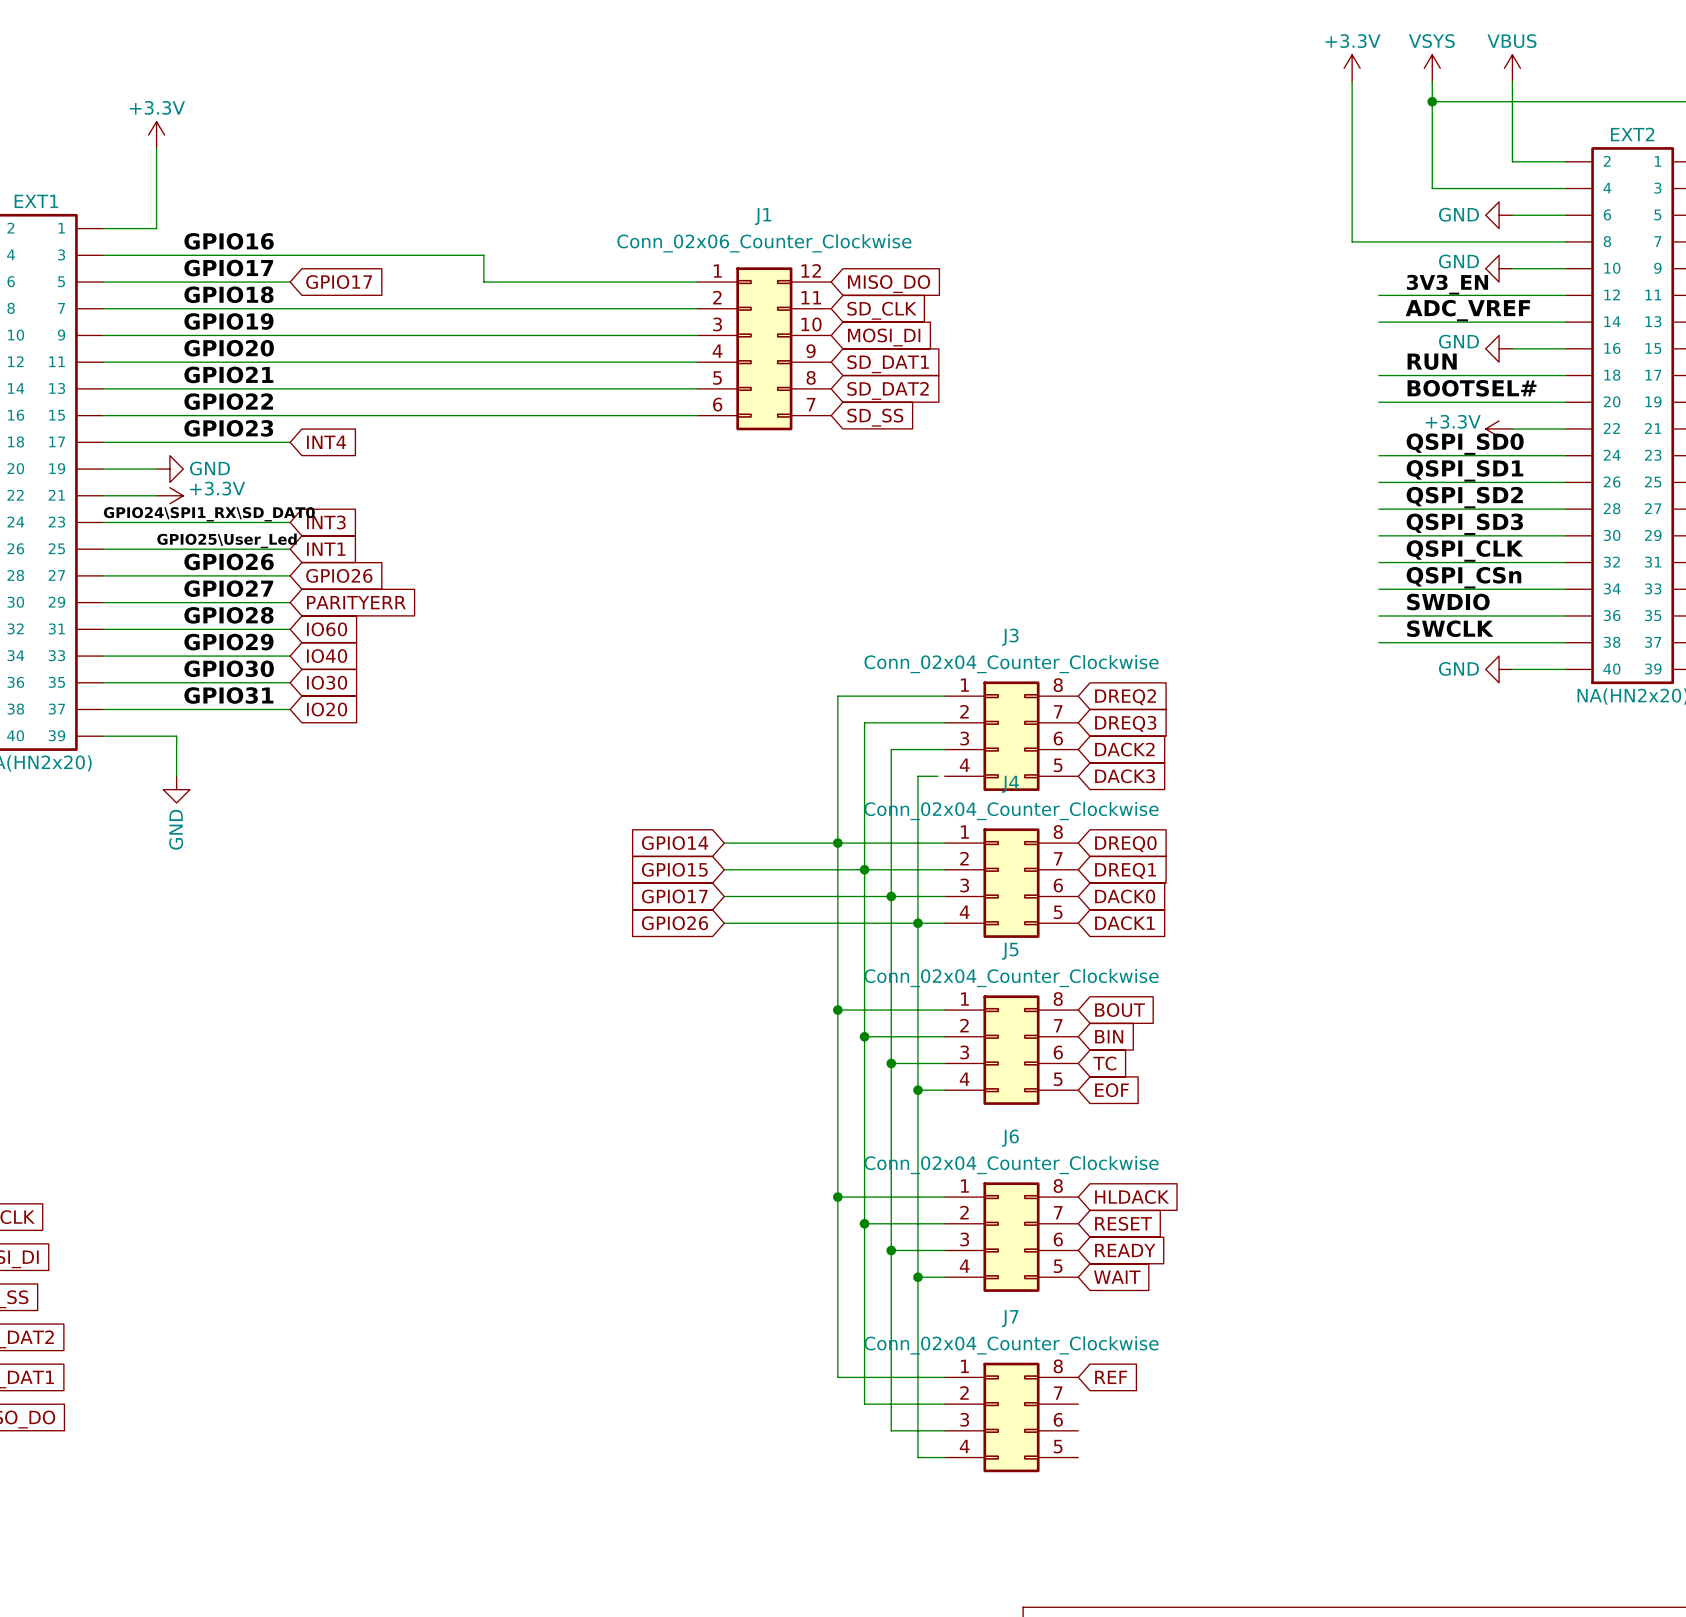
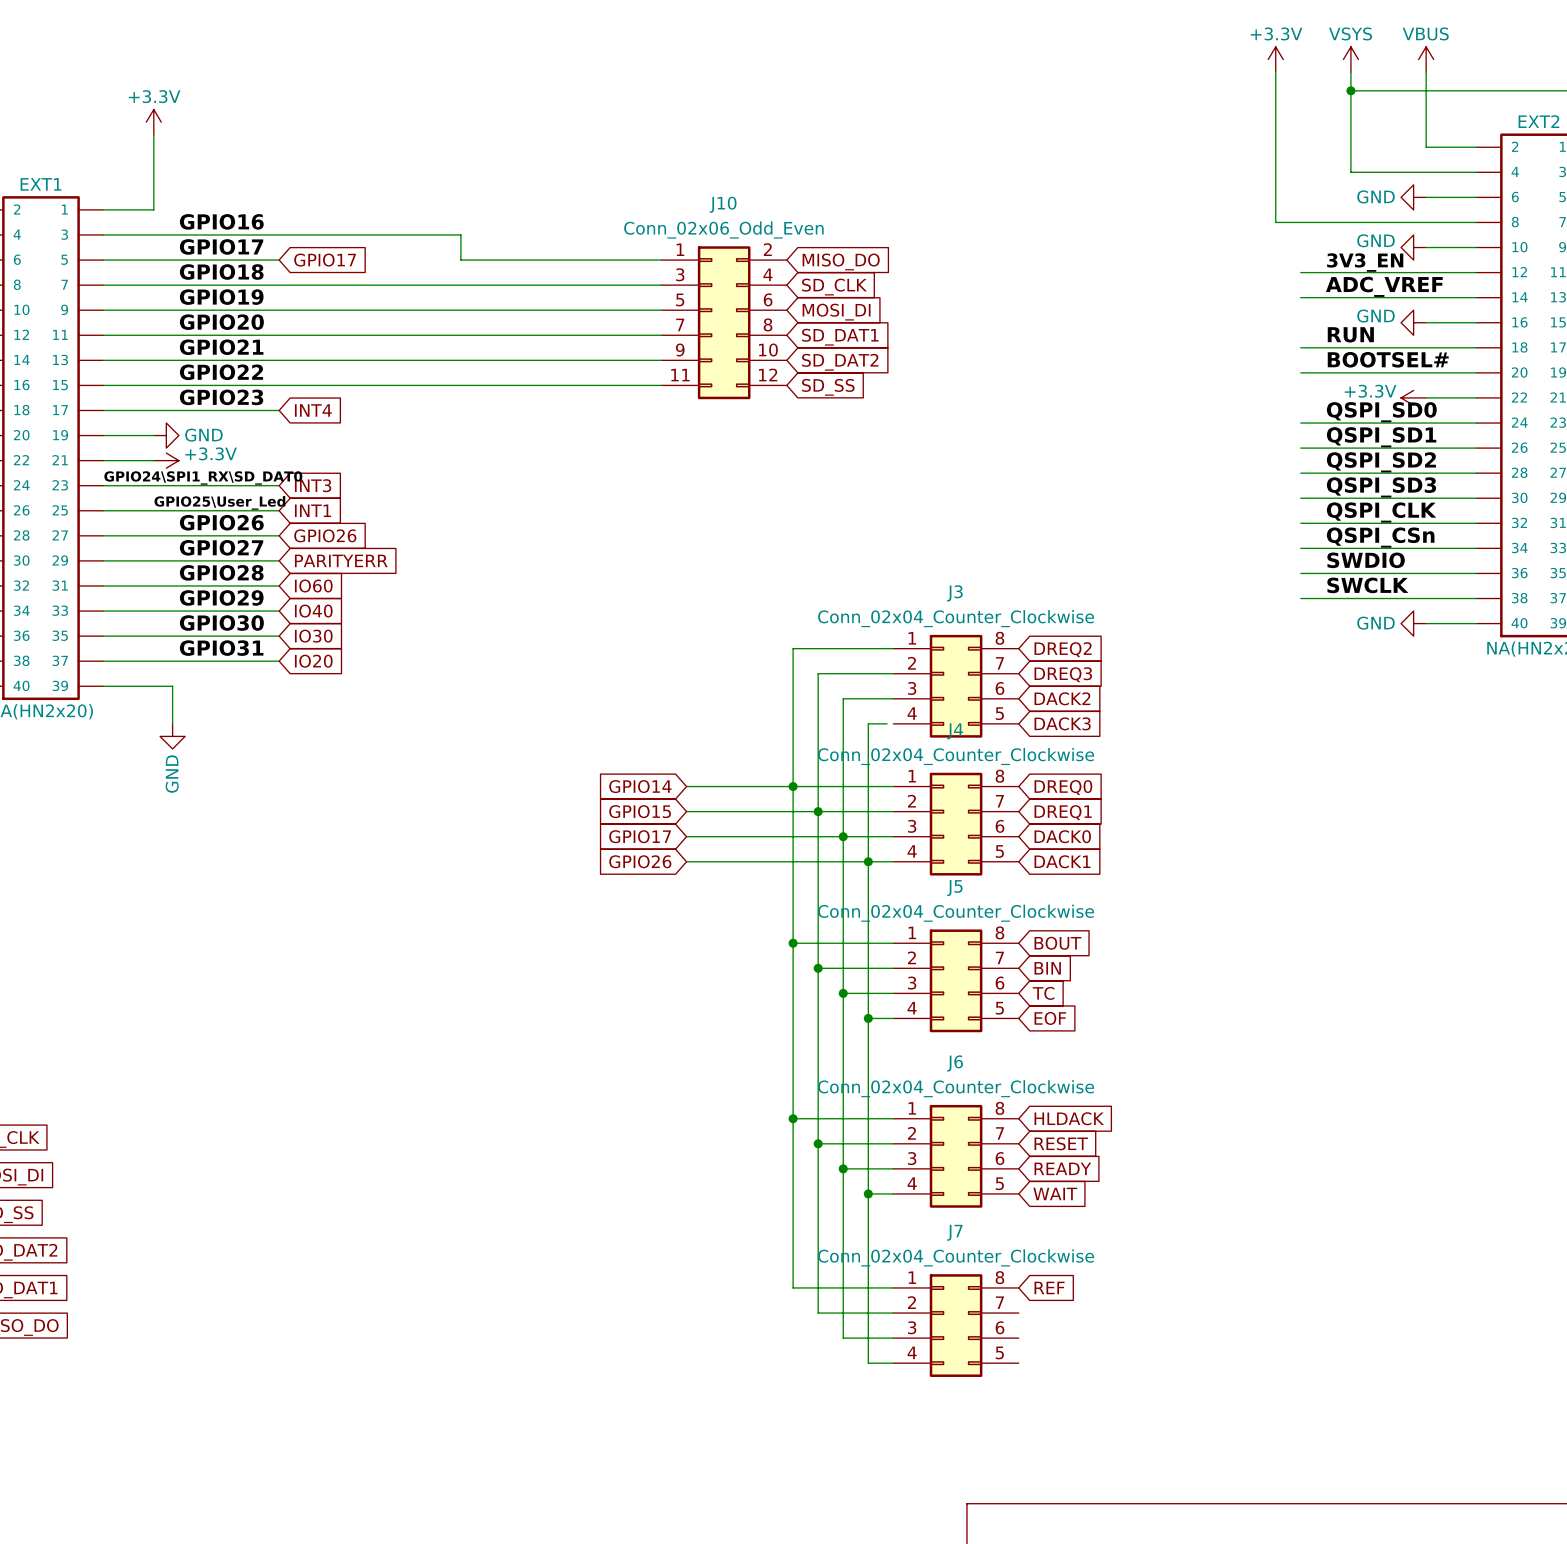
J1 name: J1 (763, 216) -> J10 (723, 204)
J1 value: Conn_02x06_Counter_Clockwise (764, 243) -> Conn_02x06_Odd_Even (723, 230)
J1 symbol: [697, 267, 832, 431] -> [661, 246, 787, 400]

